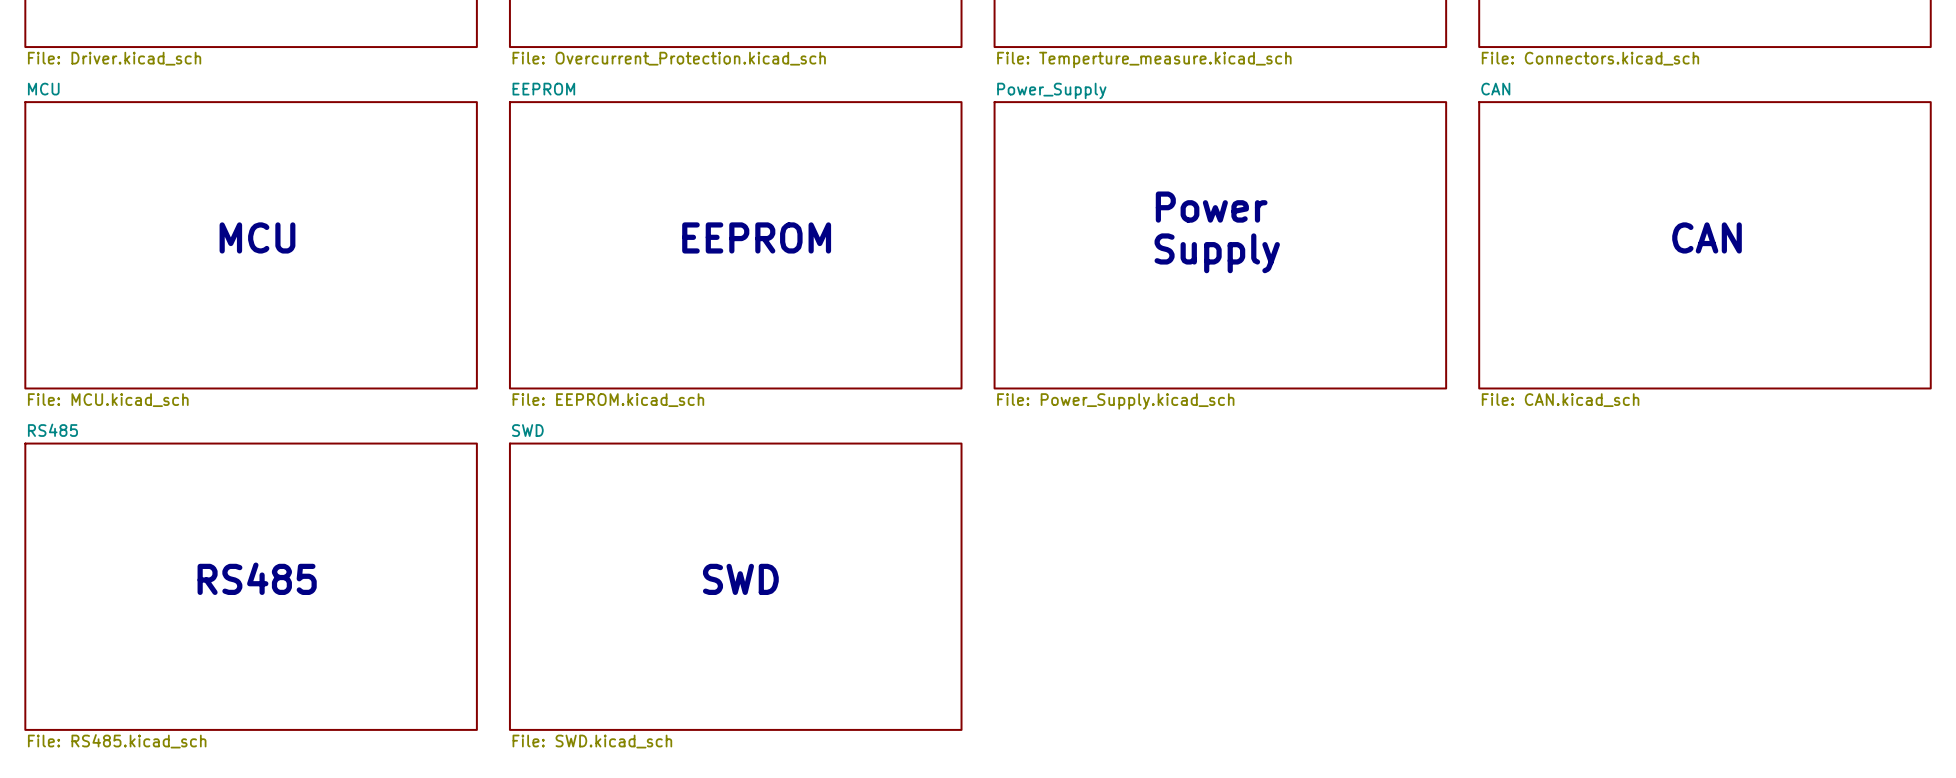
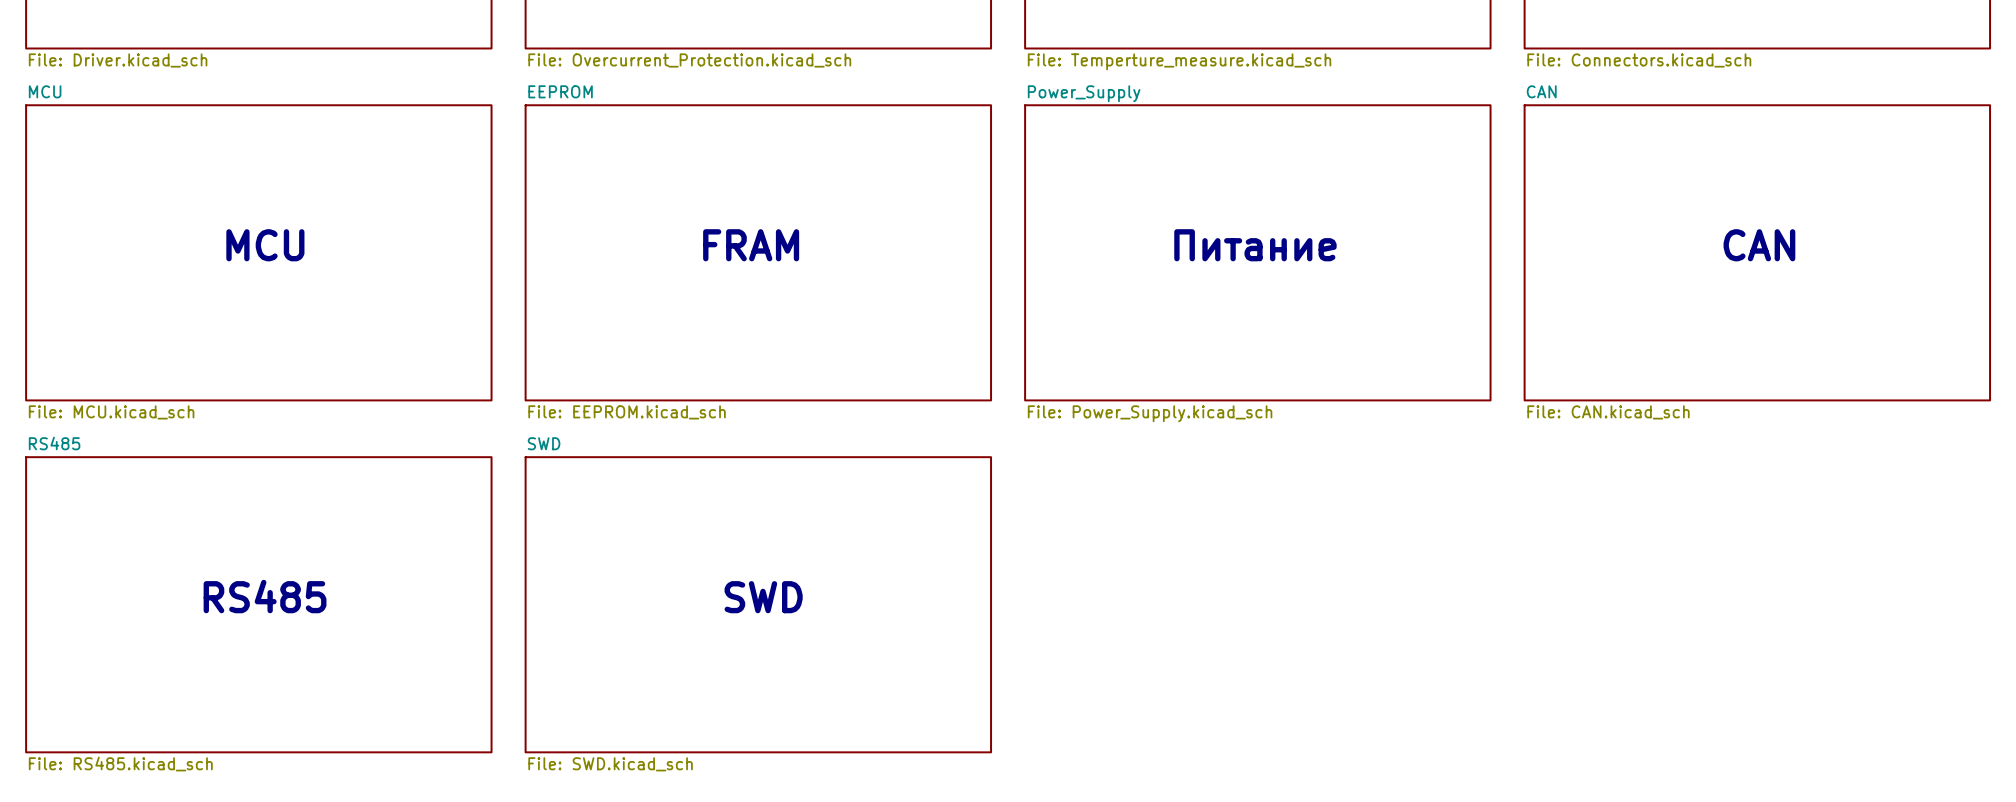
text: Power (1211, 207) -> none
text: EEPROM (756, 237) -> FRAM (751, 245)
text: none -> Питание (1255, 245)
text: Supply (1217, 253) -> none

